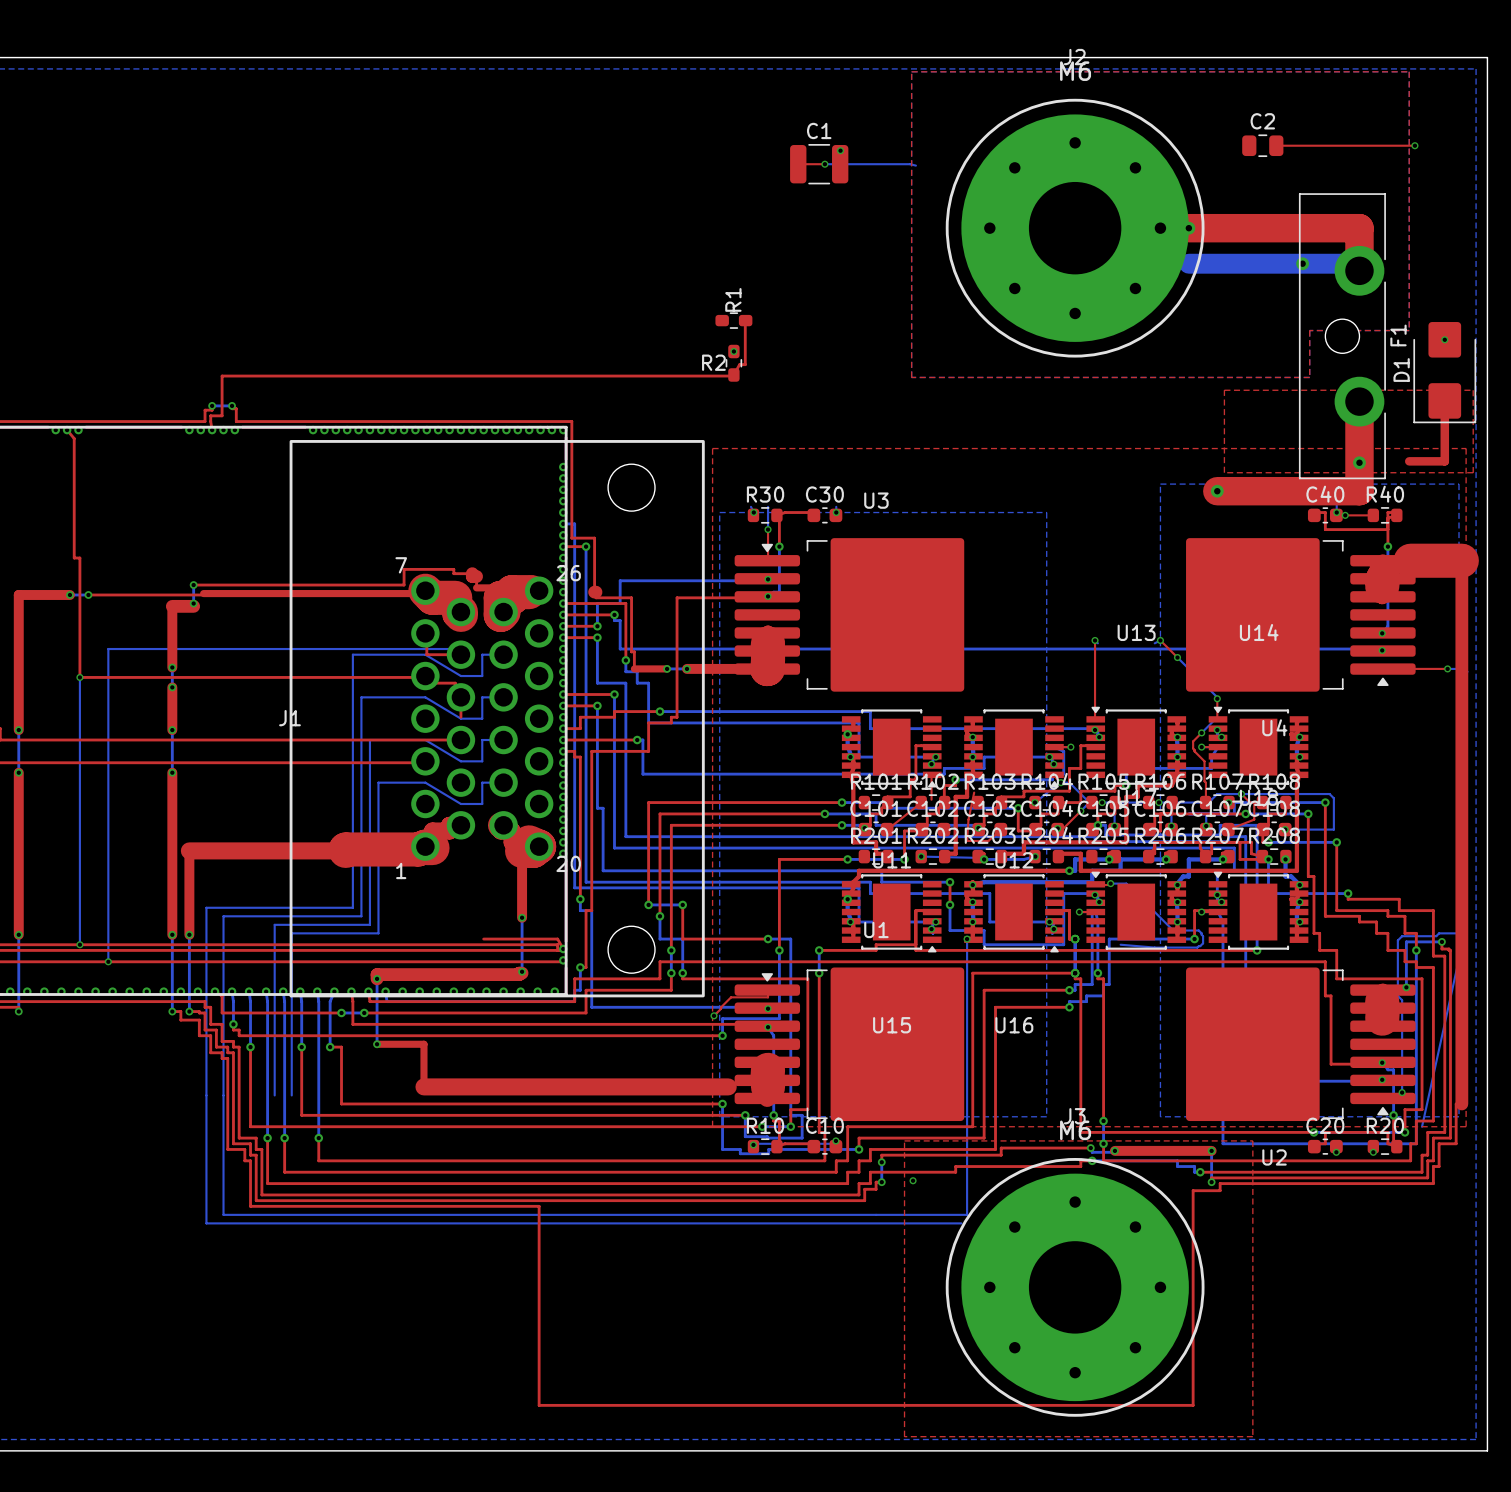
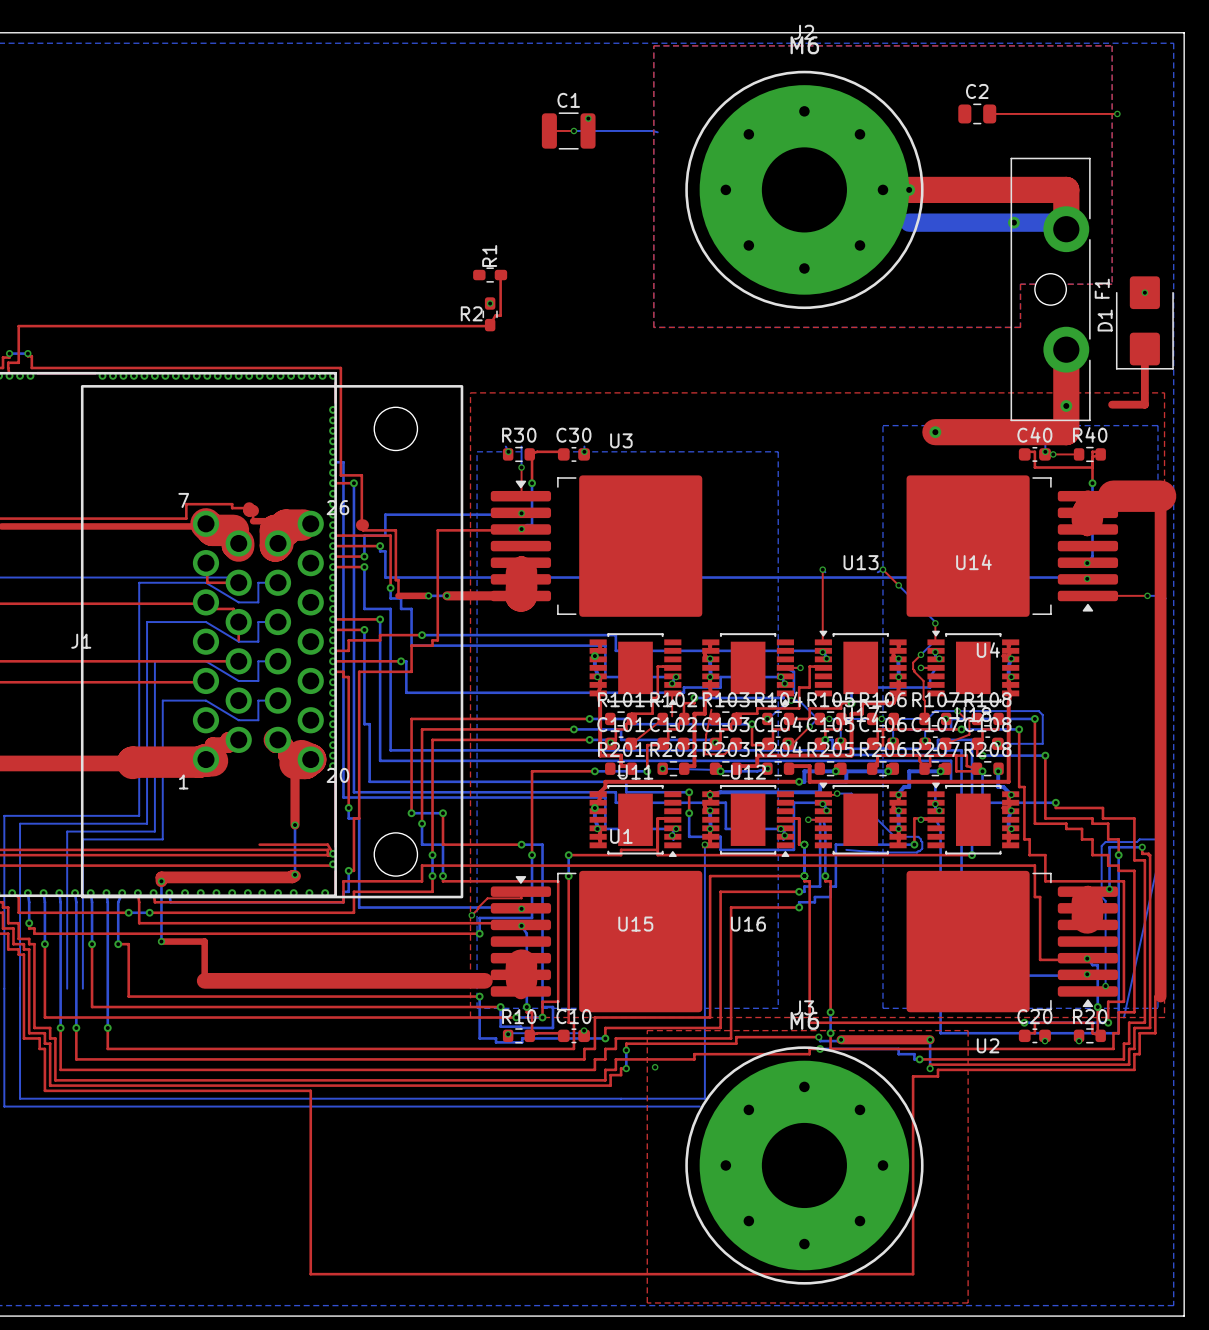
top zone outline: (1224, 390) (1473, 390) (1473, 472) (1224, 472) (1224, 390) -> none

